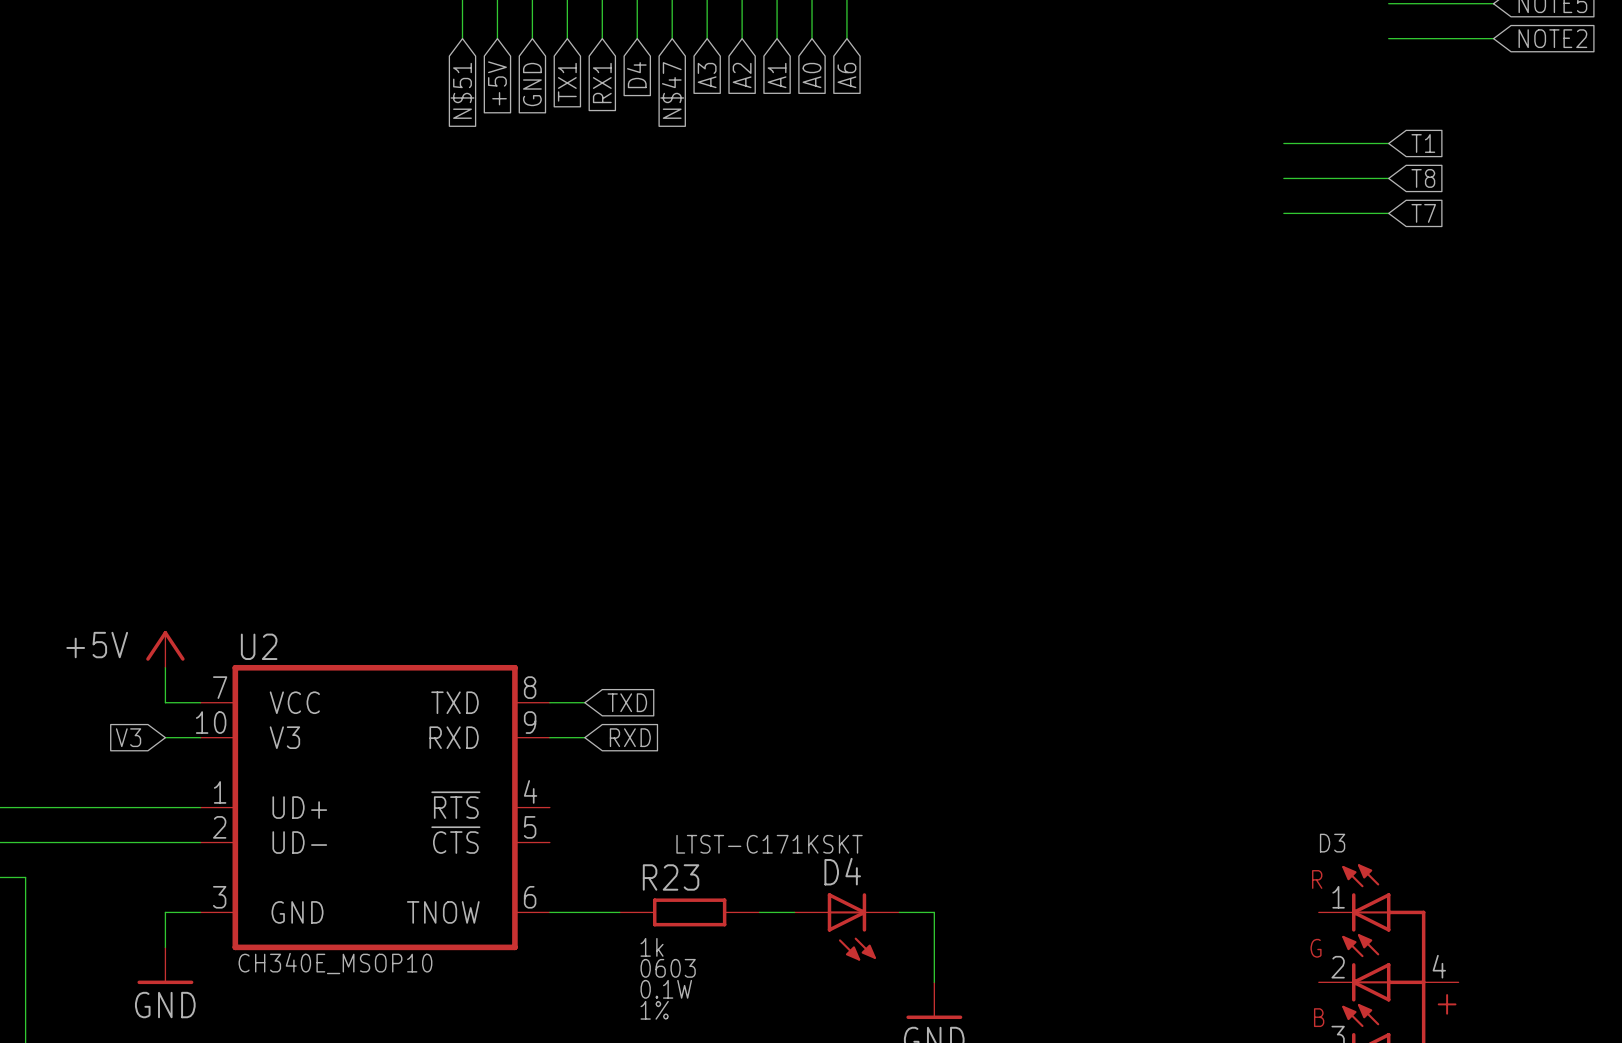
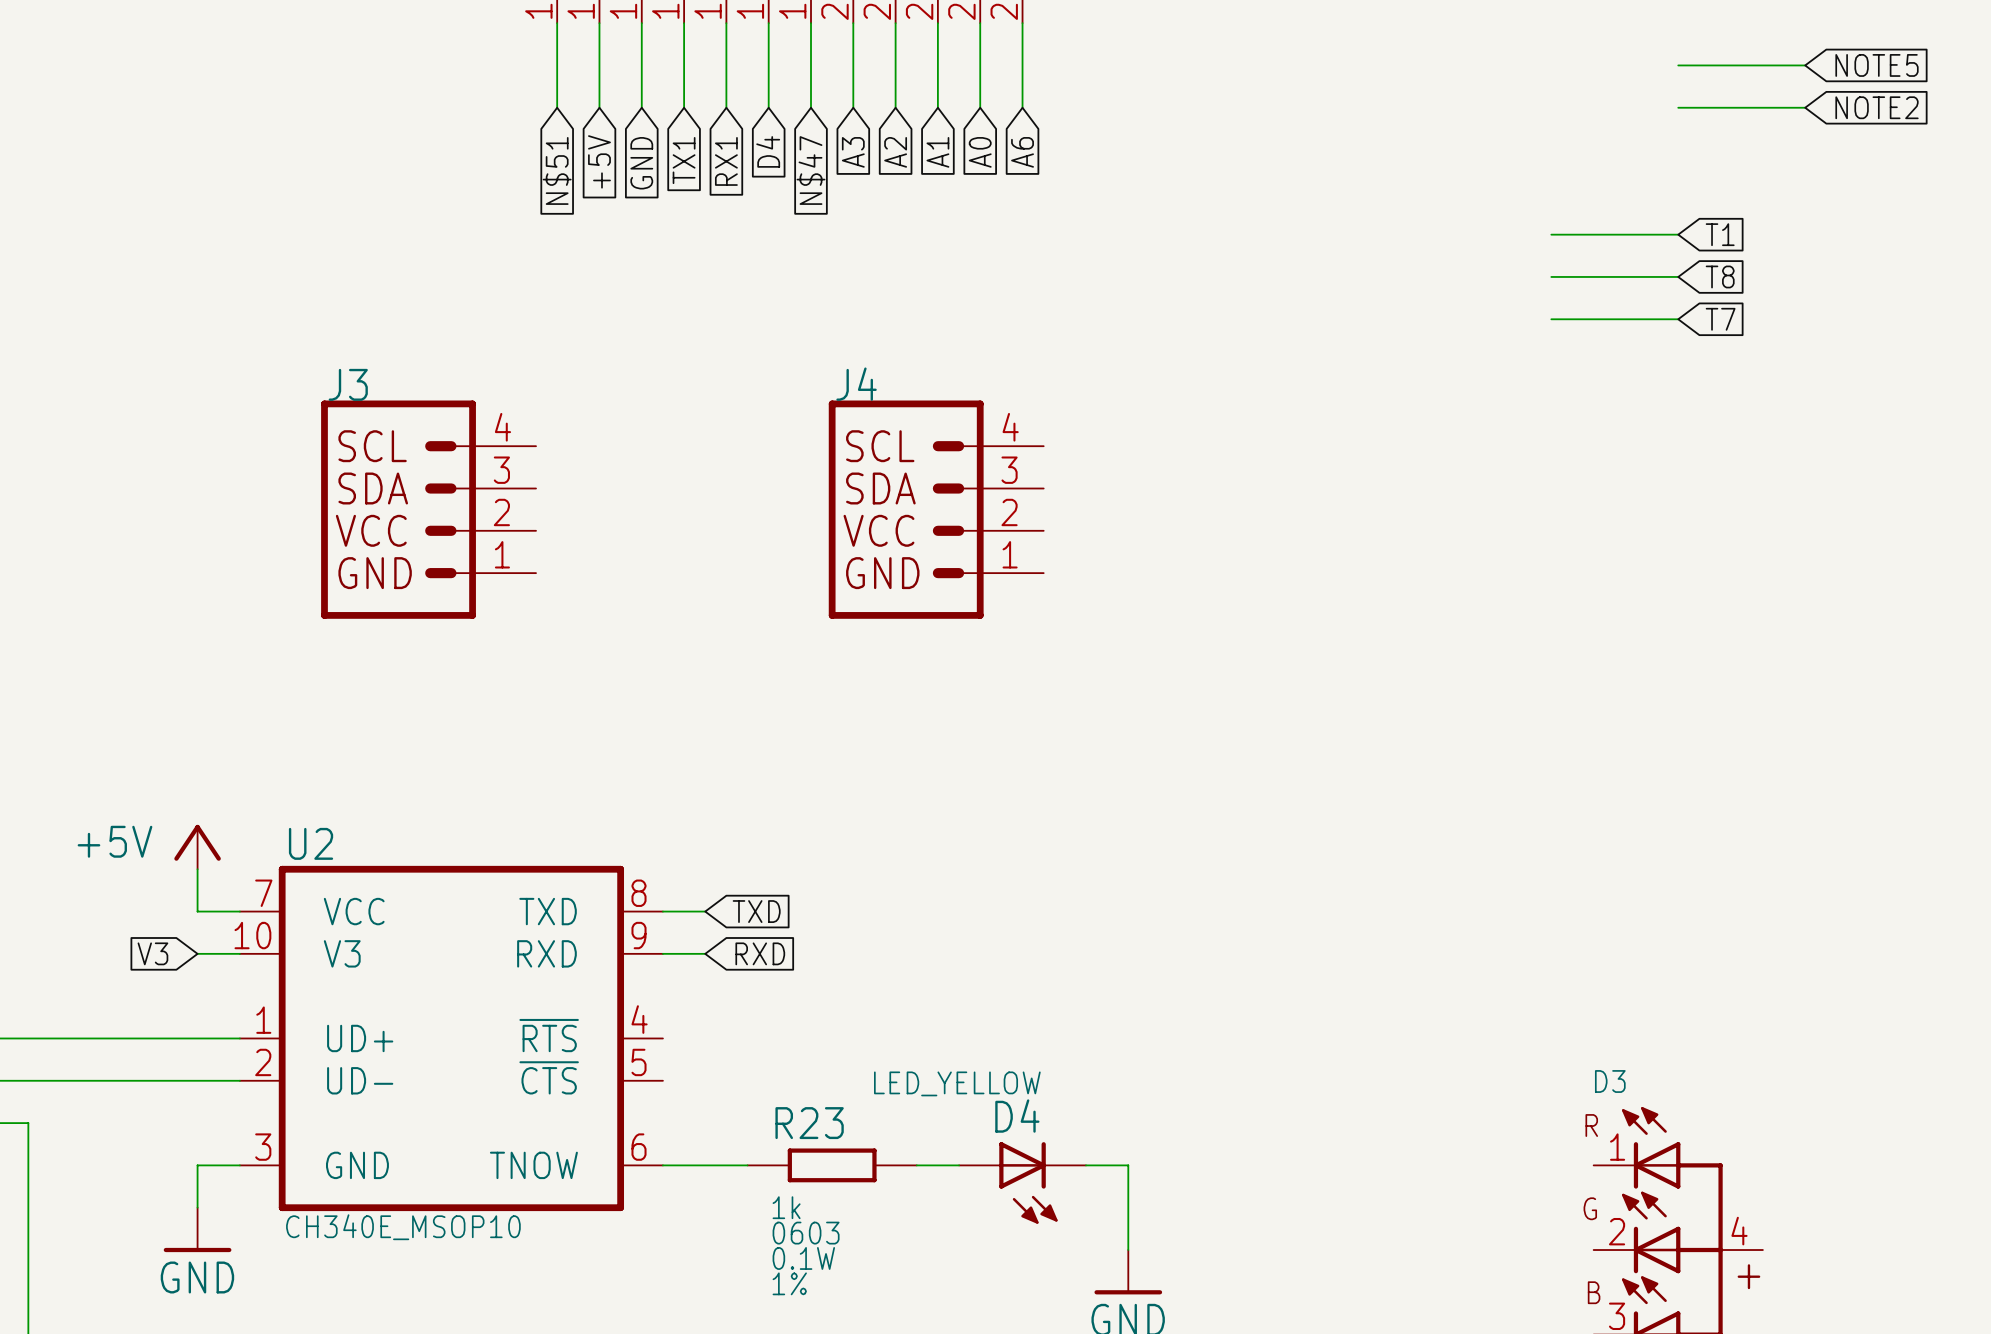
J3: none -> (428, 509)
J4: none -> (936, 509)
D4 value: LTST-C171KSKT (769, 844) -> LED_YELLOW (957, 1083)

